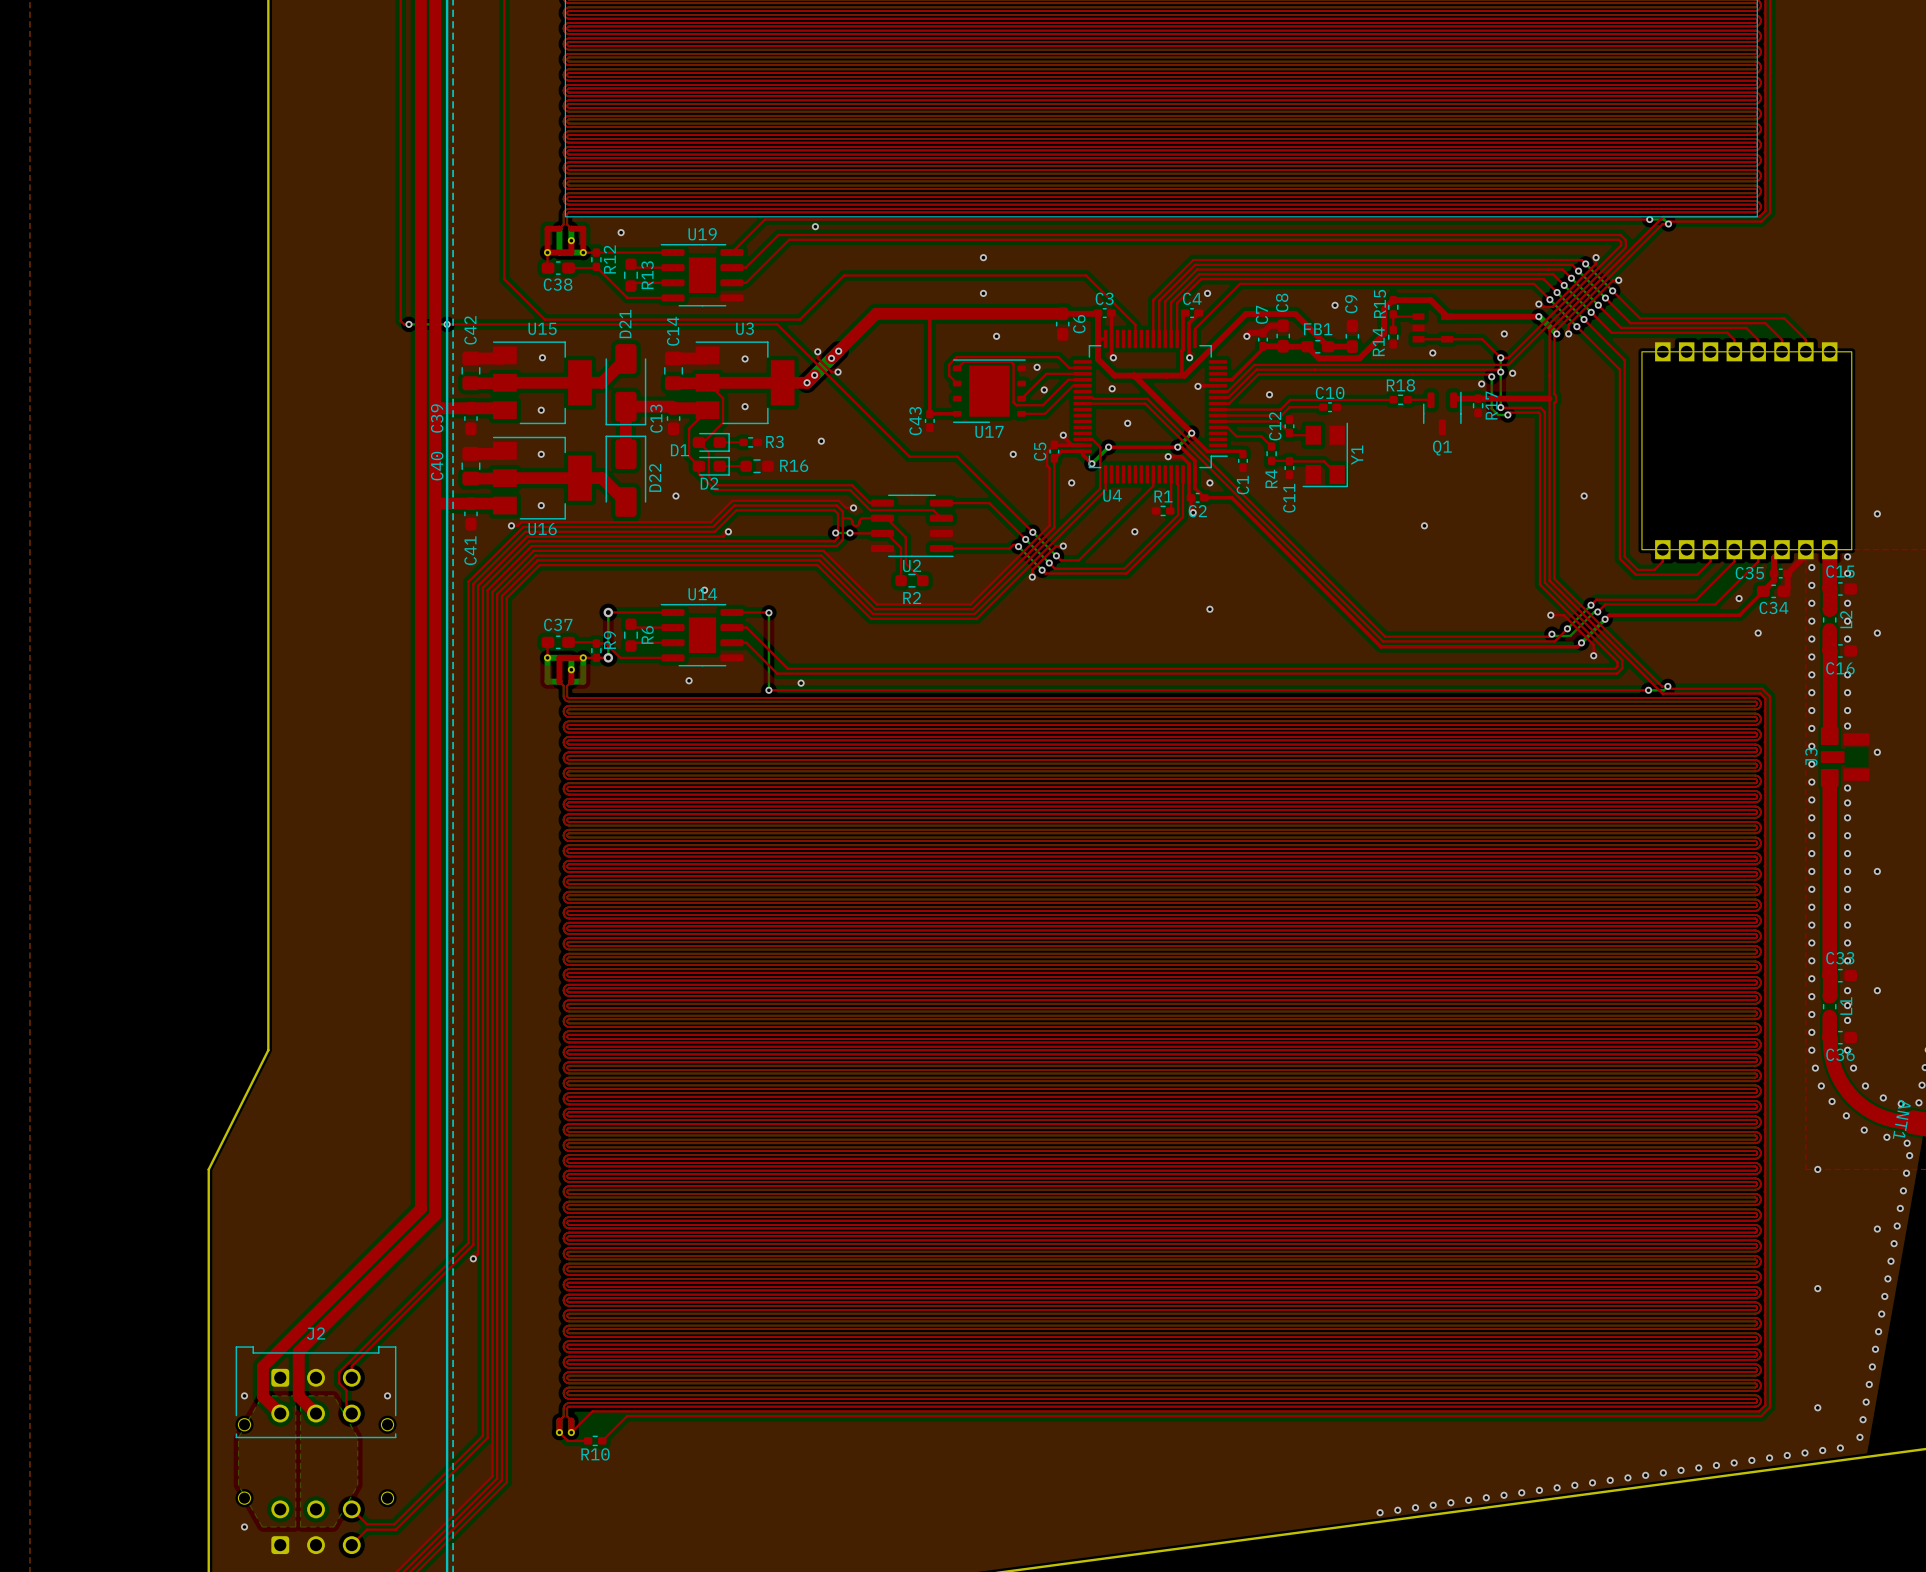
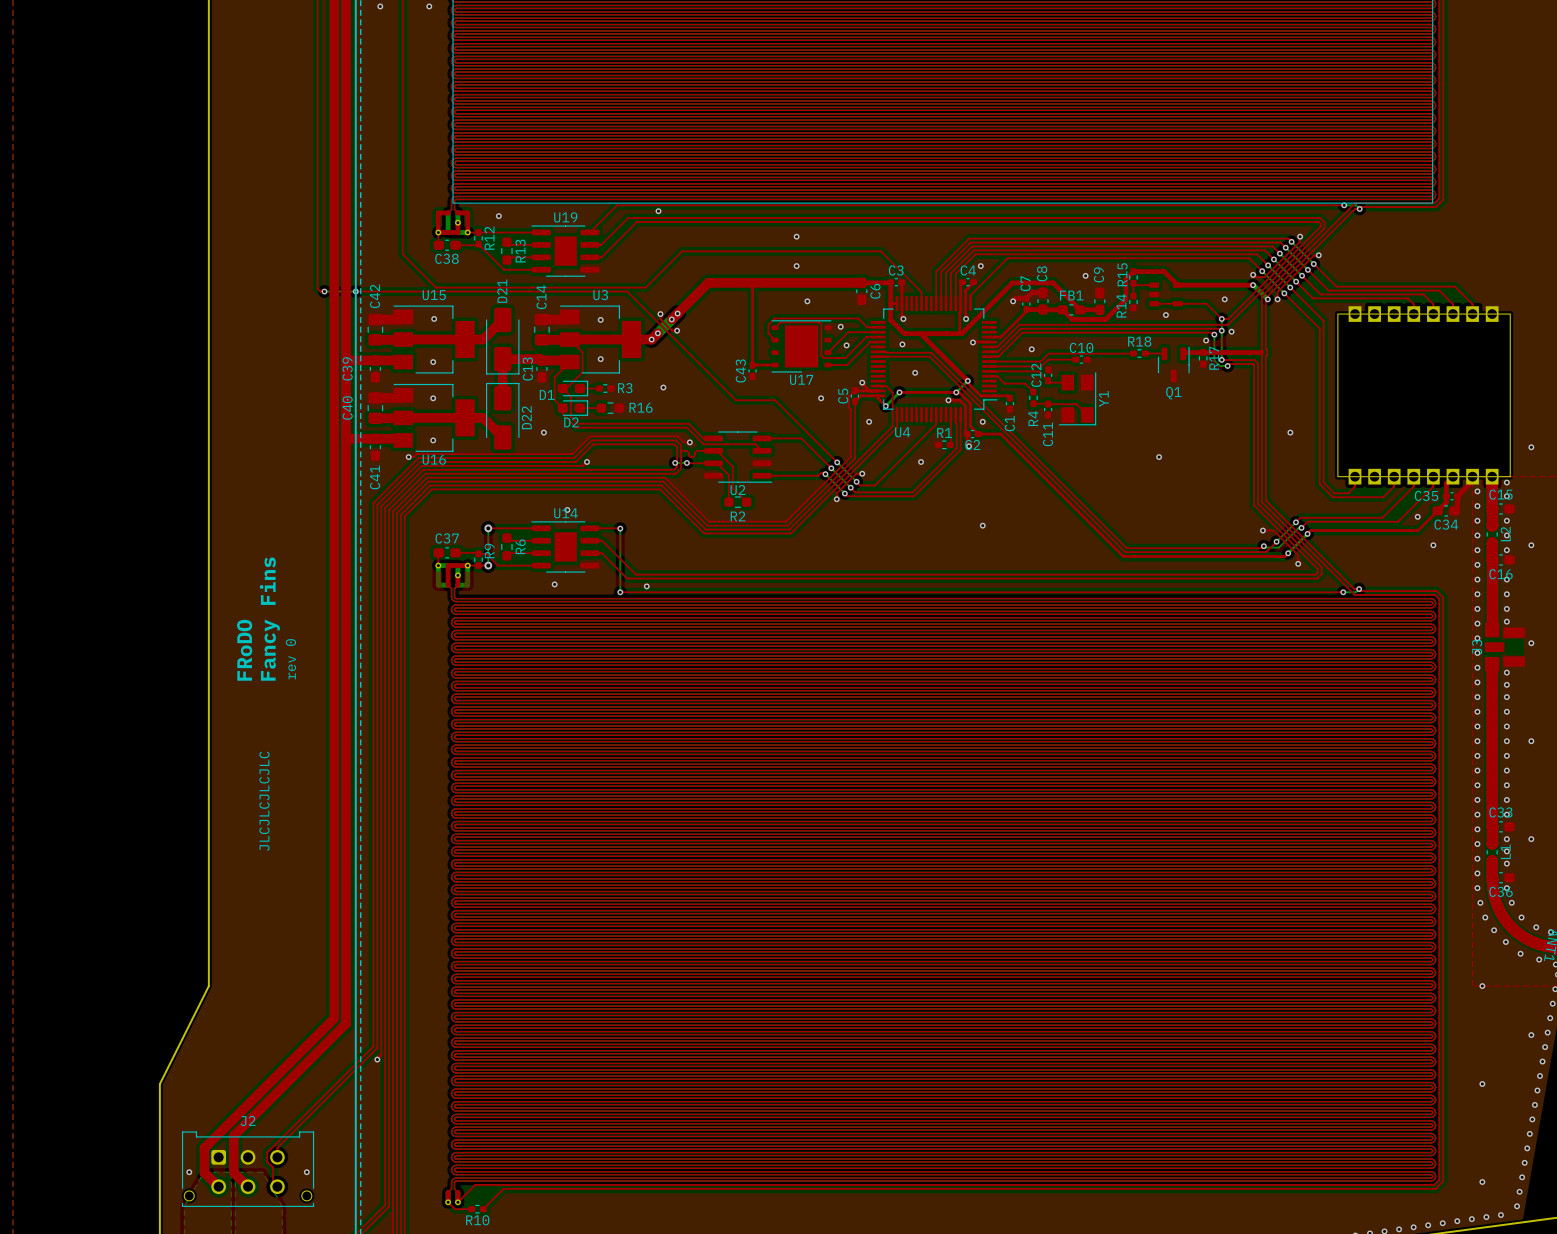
text: none -> Fancy Fins (269, 619)
text: none -> FRoDO (244, 650)
text: none -> rev 0 (290, 659)
text: none -> JLCJLCJLCJLC (264, 801)
board edge: (268, 1050) (208, 1169) (208, 1288) -> (208, 888) (208, 986) (159, 1084)

